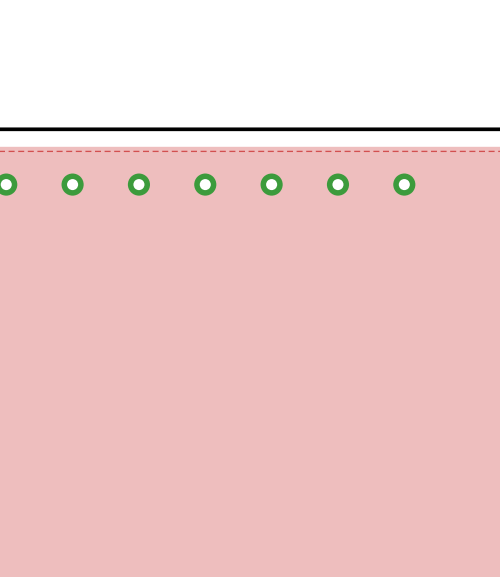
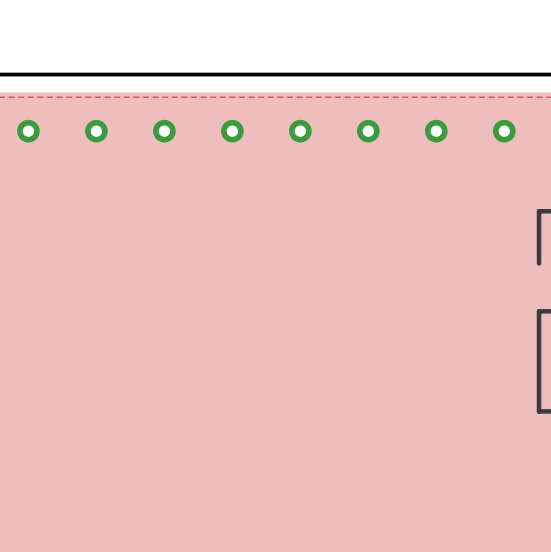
via: none -> (504, 131)

